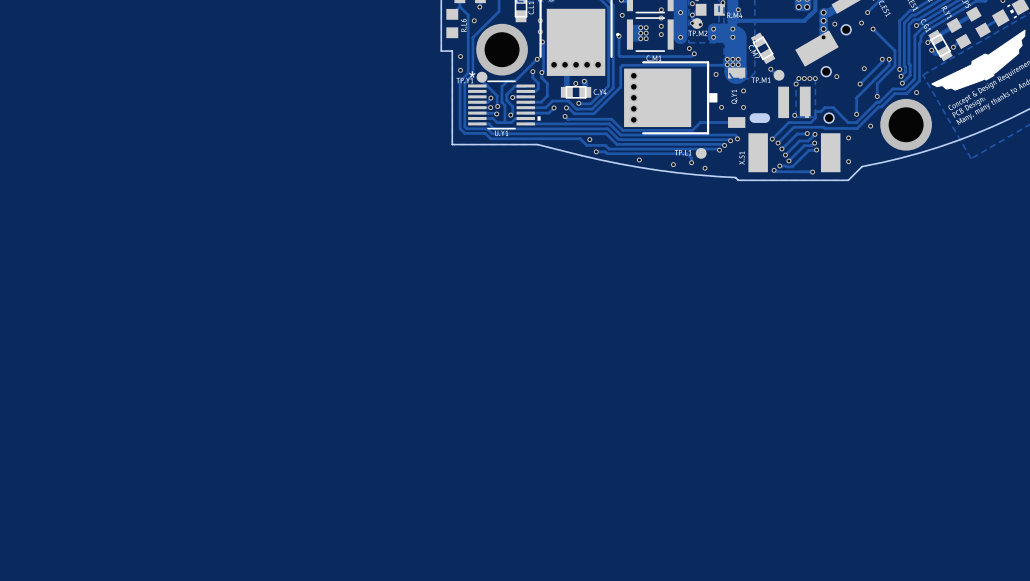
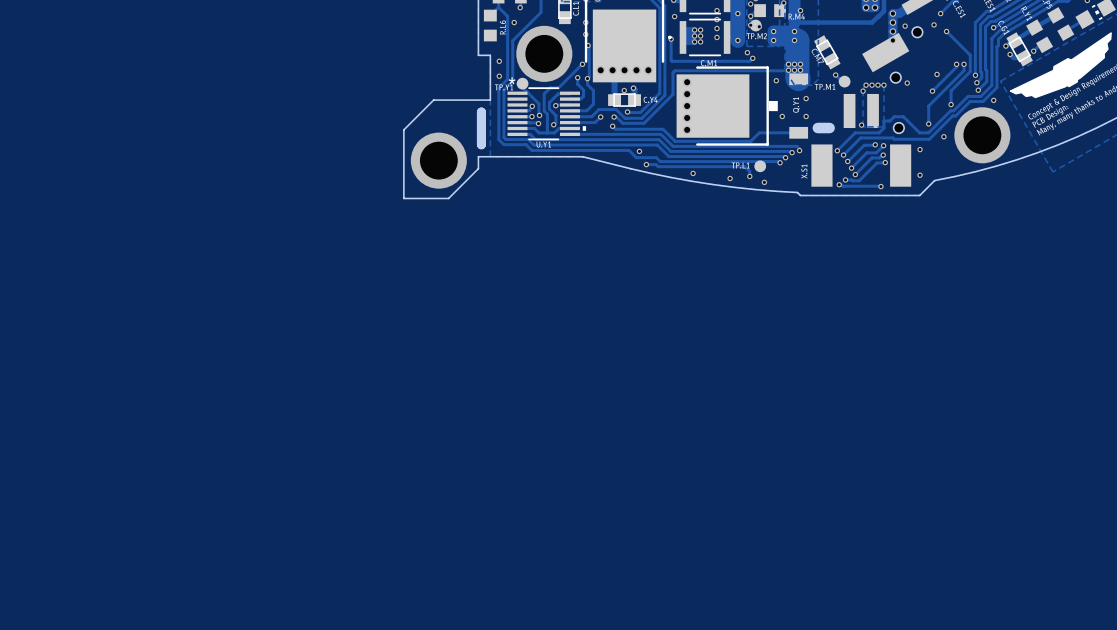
board edge: (452, 92) (452, 144) -> (490, 100) (433, 100) (403, 129) (403, 198) (448, 198) (478, 168) (478, 156) (490, 156)
board edge: none -> (481, 112) (481, 144)
via: none -> (438, 160)

